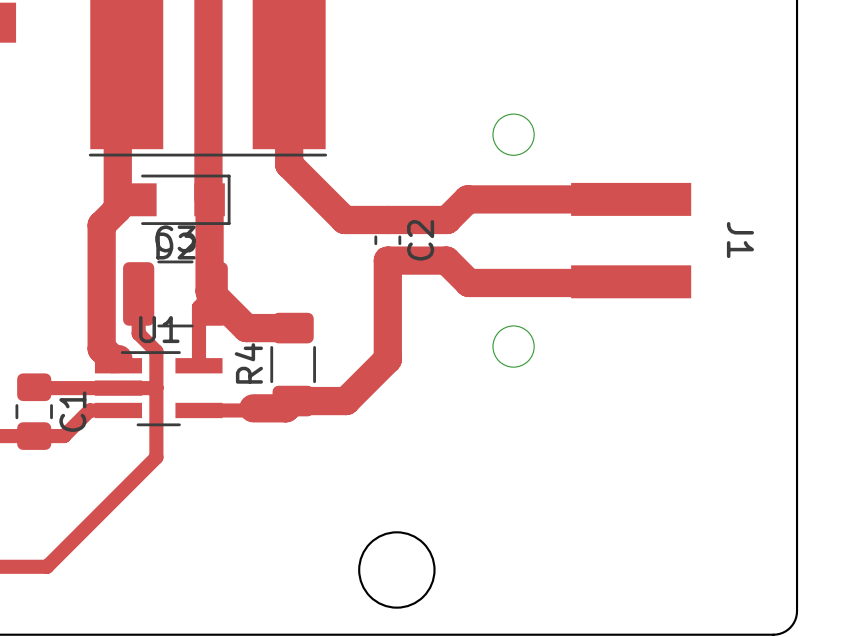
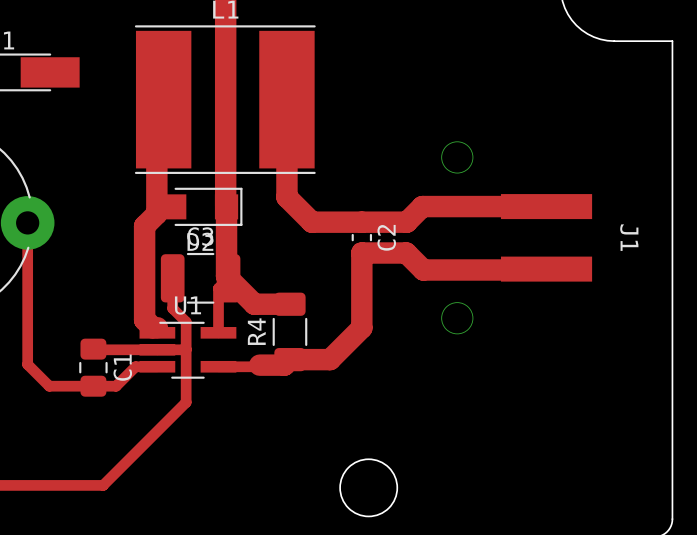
track: (289, 164) (344, 219) -> (286, 180) (286, 197) (311, 222) (329, 222)

